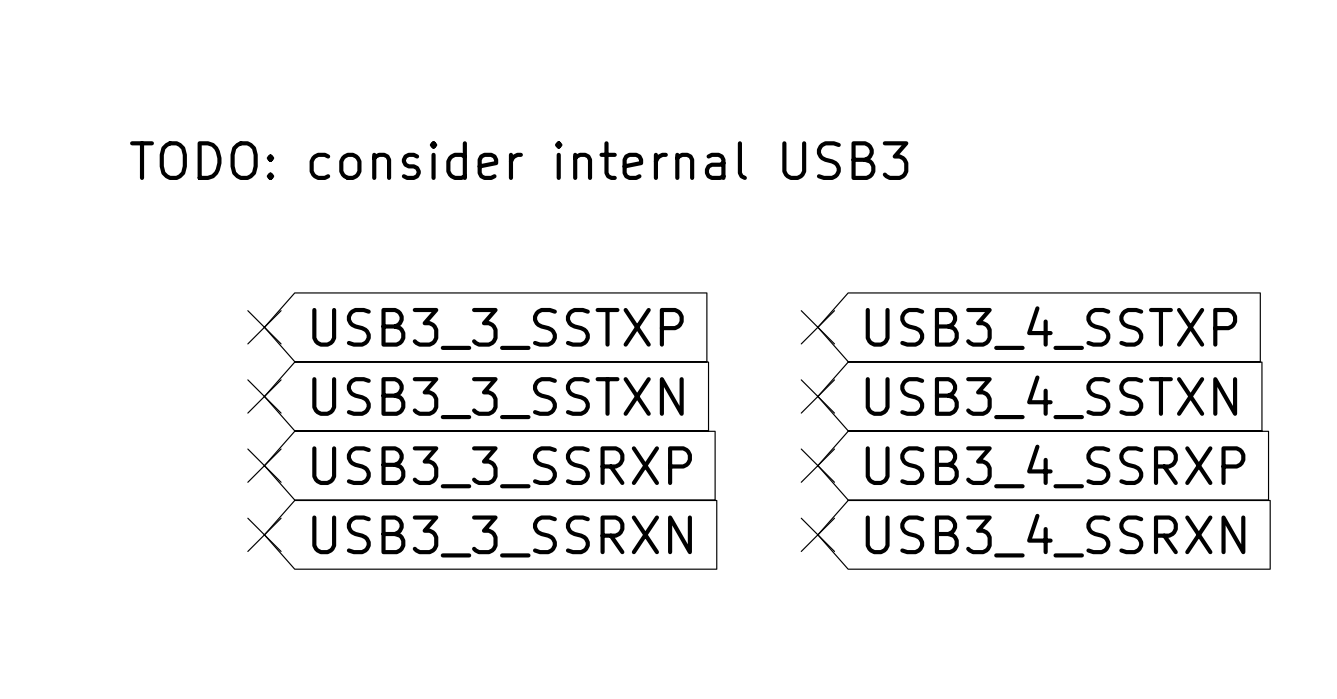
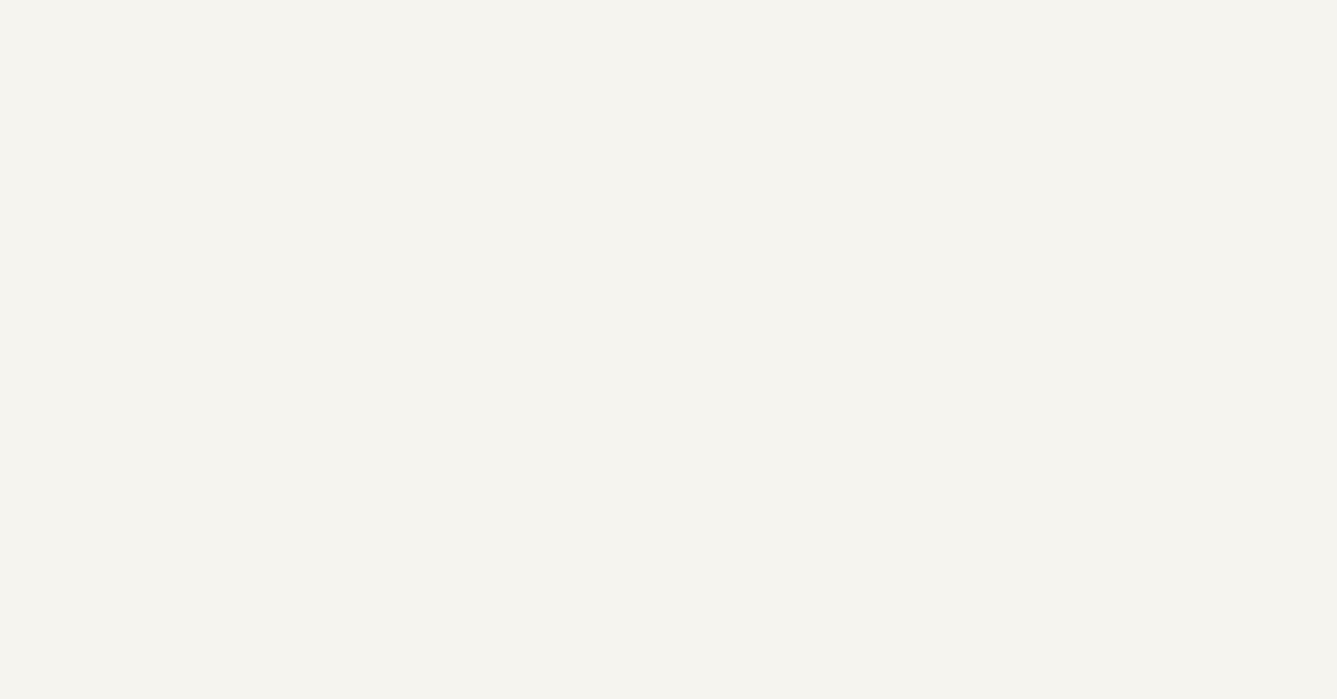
text: TODO: consider internal USB3 (519, 160) -> none
no-connect mark: (264, 327) -> none
no-connect mark: (817, 327) -> none
global label: USB3_3_SSTXP (497, 328) -> none
global label: USB3_4_SSTXP (1051, 328) -> none
no-connect mark: (264, 396) -> none
no-connect mark: (817, 396) -> none
global label: USB3_4_SSTXN (1051, 397) -> none
global label: USB3_3_SSTXN (497, 398) -> none
no-connect mark: (264, 465) -> none
no-connect mark: (817, 465) -> none
global label: USB3_4_SSRXP (1055, 466) -> none
global label: USB3_3_SSRXP (502, 467) -> none
no-connect mark: (264, 534) -> none
no-connect mark: (817, 534) -> none
global label: USB3_4_SSRXN (1055, 535) -> none
global label: USB3_3_SSRXN (502, 536) -> none

